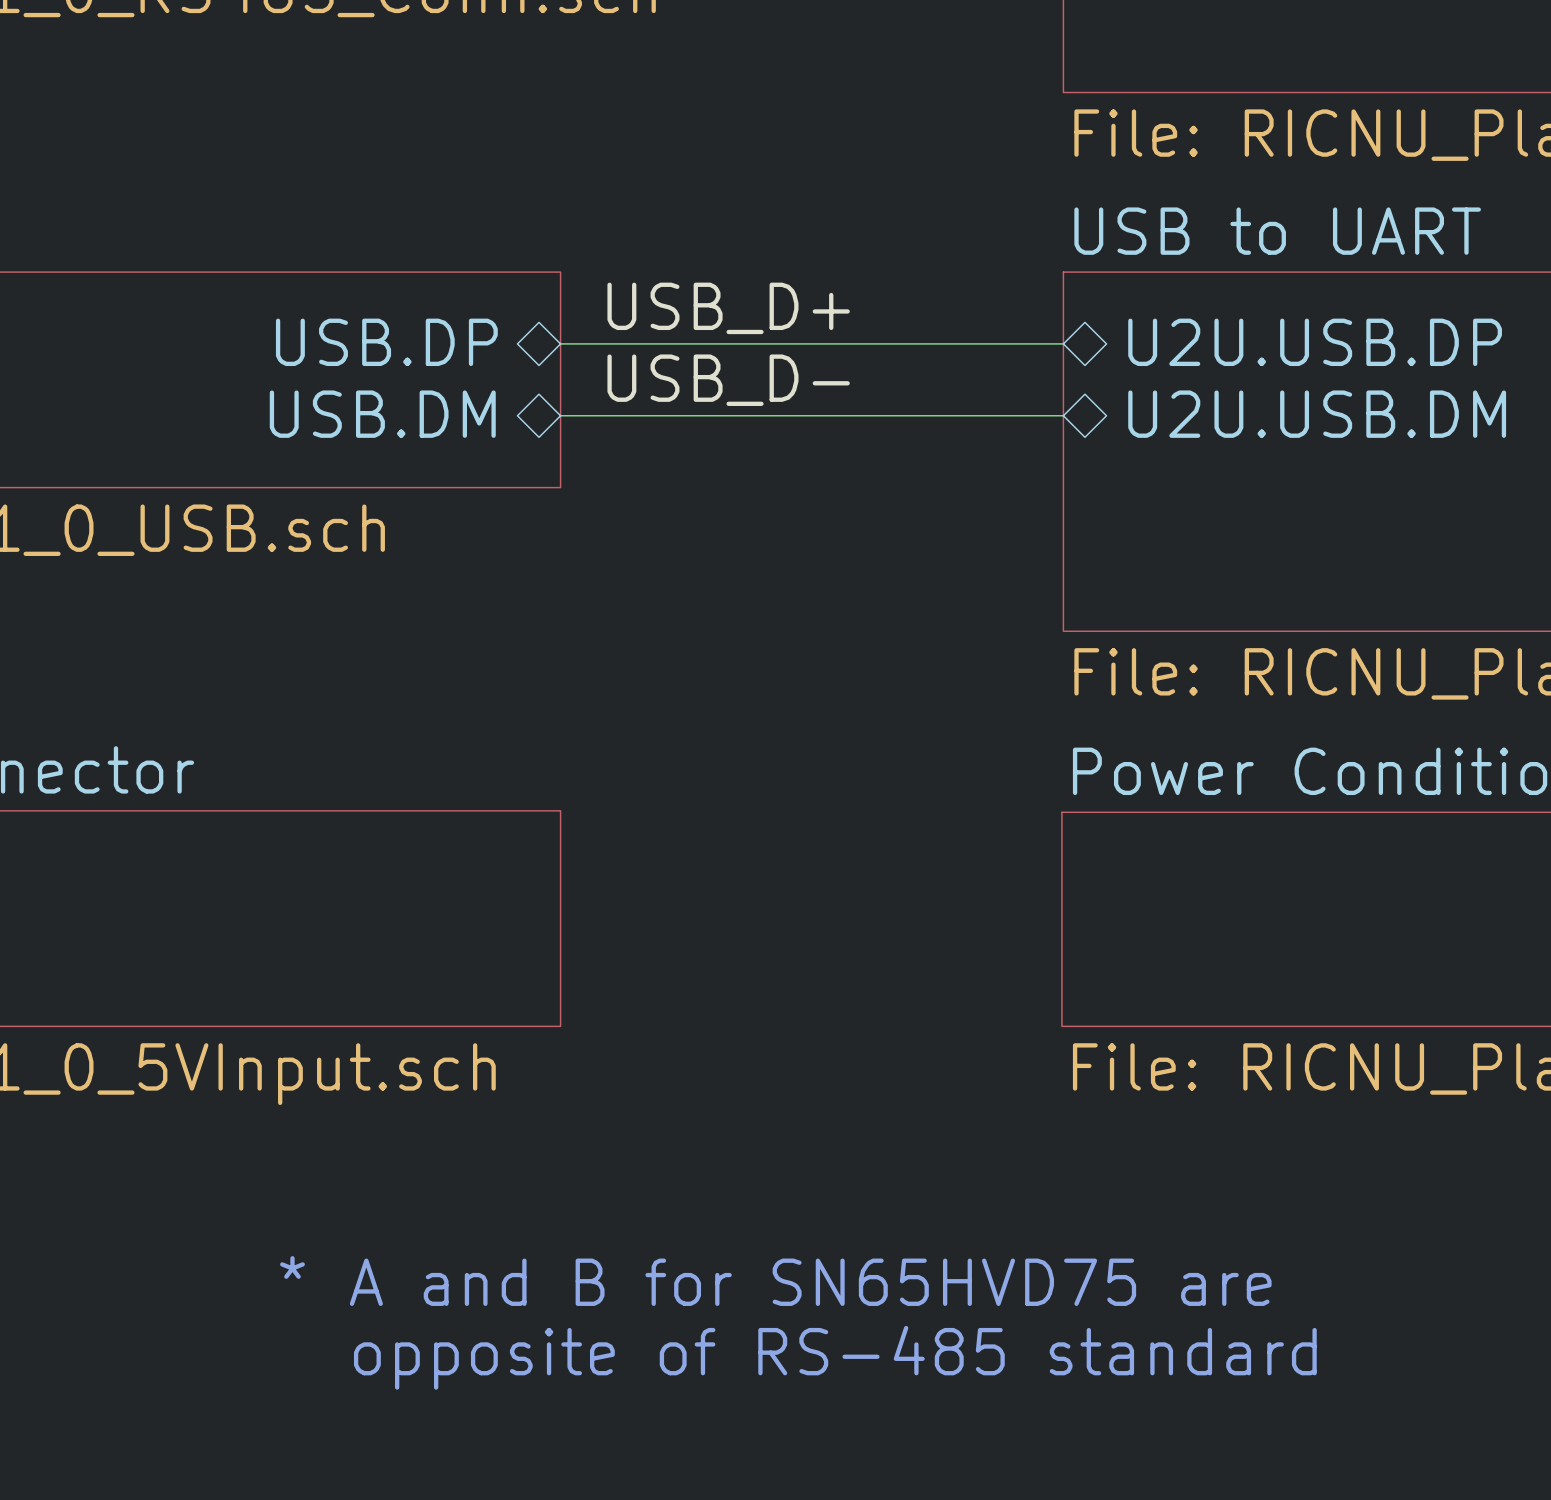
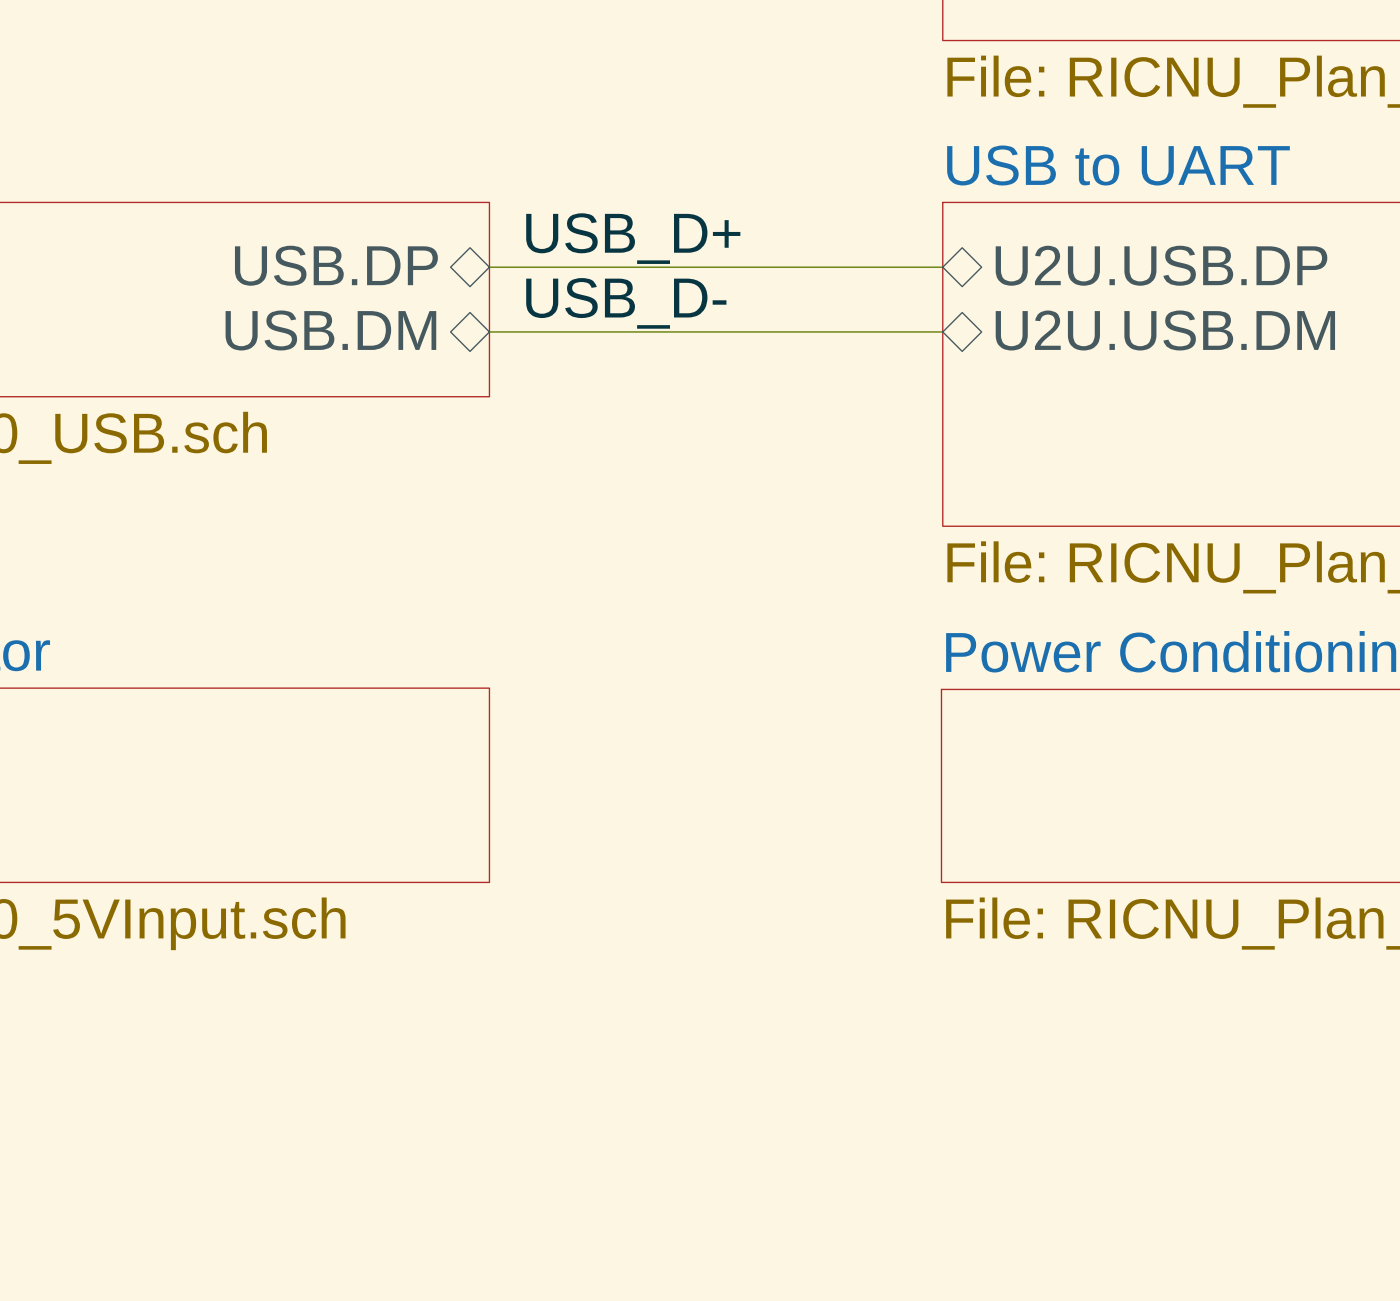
text: * (292, 1267) -> none
text: A and B for SN65HVD75 are (810, 1282) -> none
text: opposite of RS-485 standard (835, 1357) -> none

